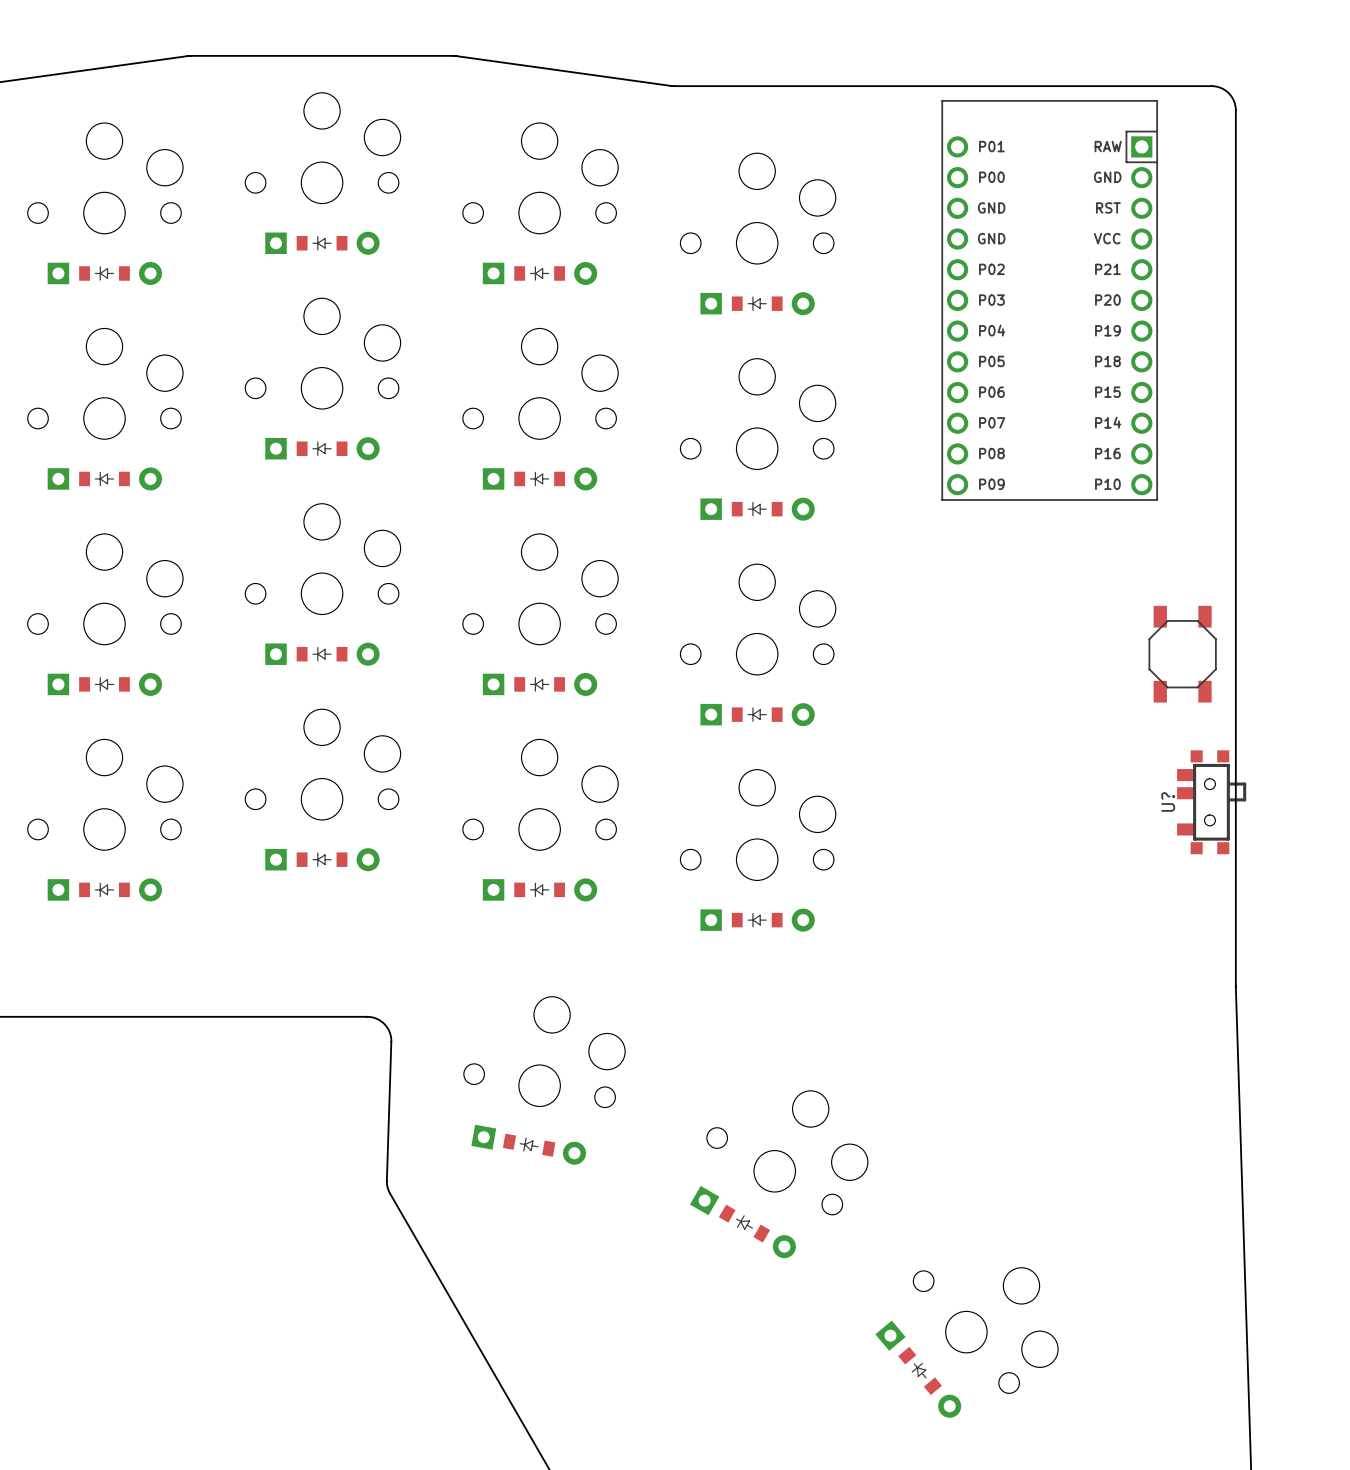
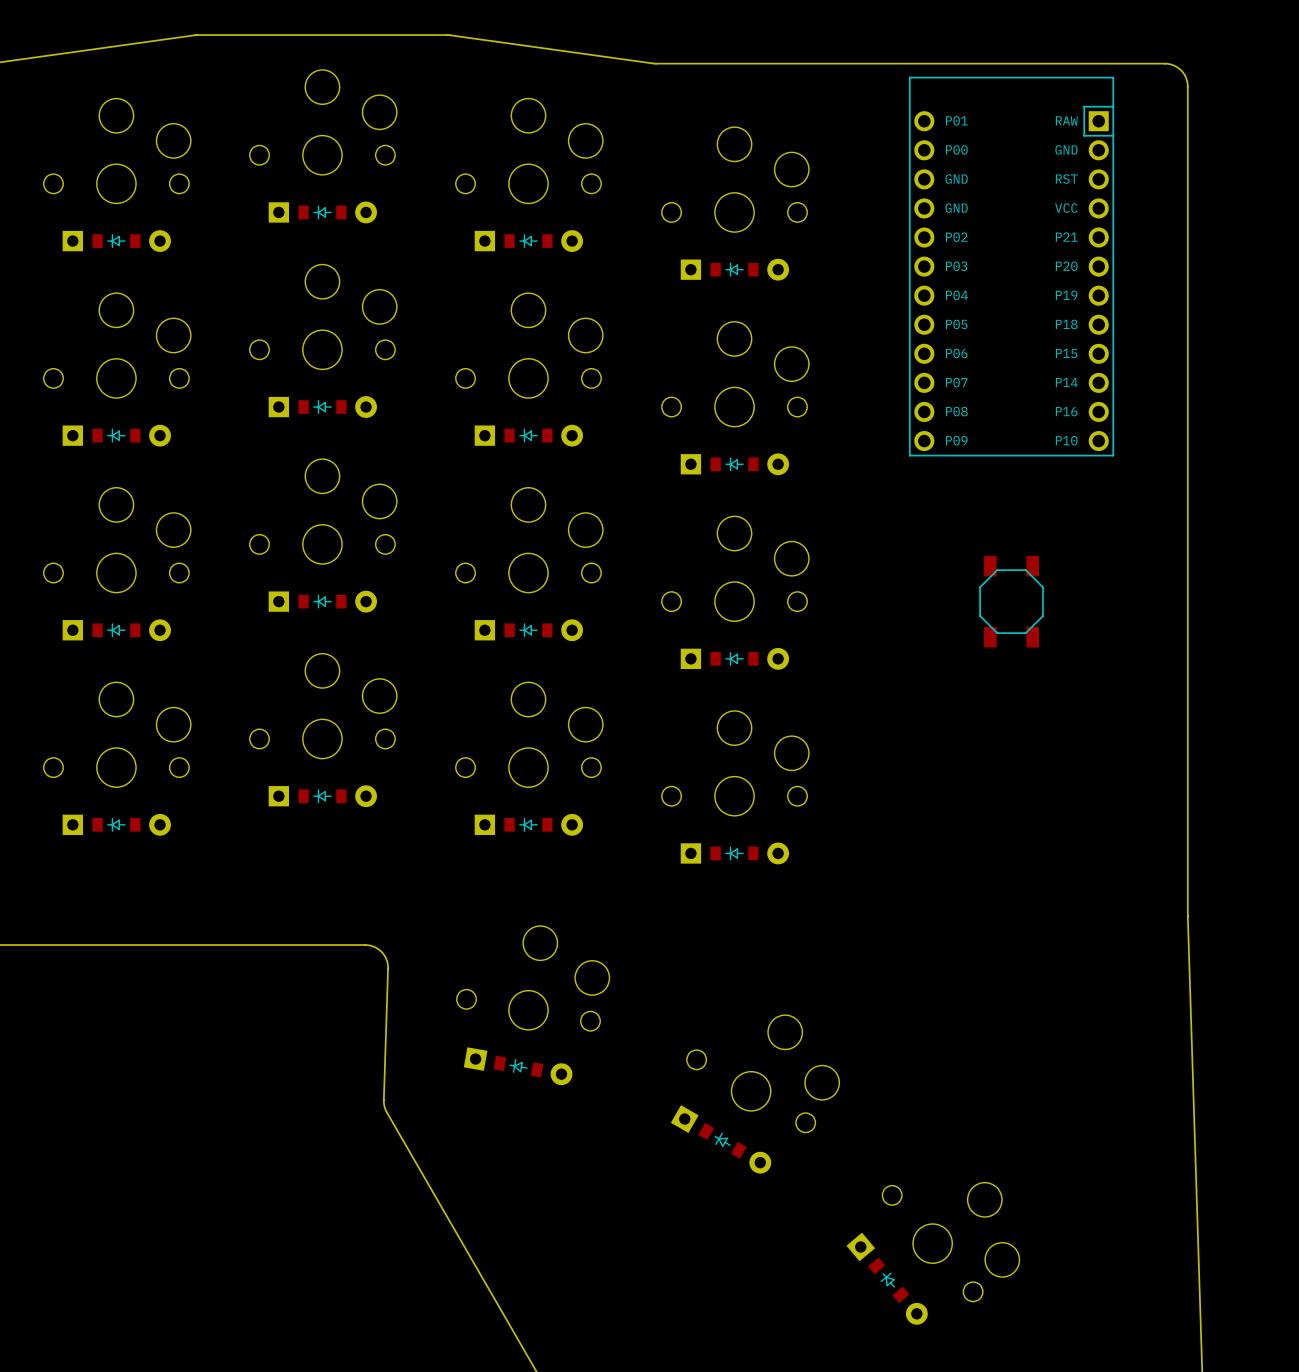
part position: (1182, 654) -> (1011, 601)
U?: (1211, 802) -> none

